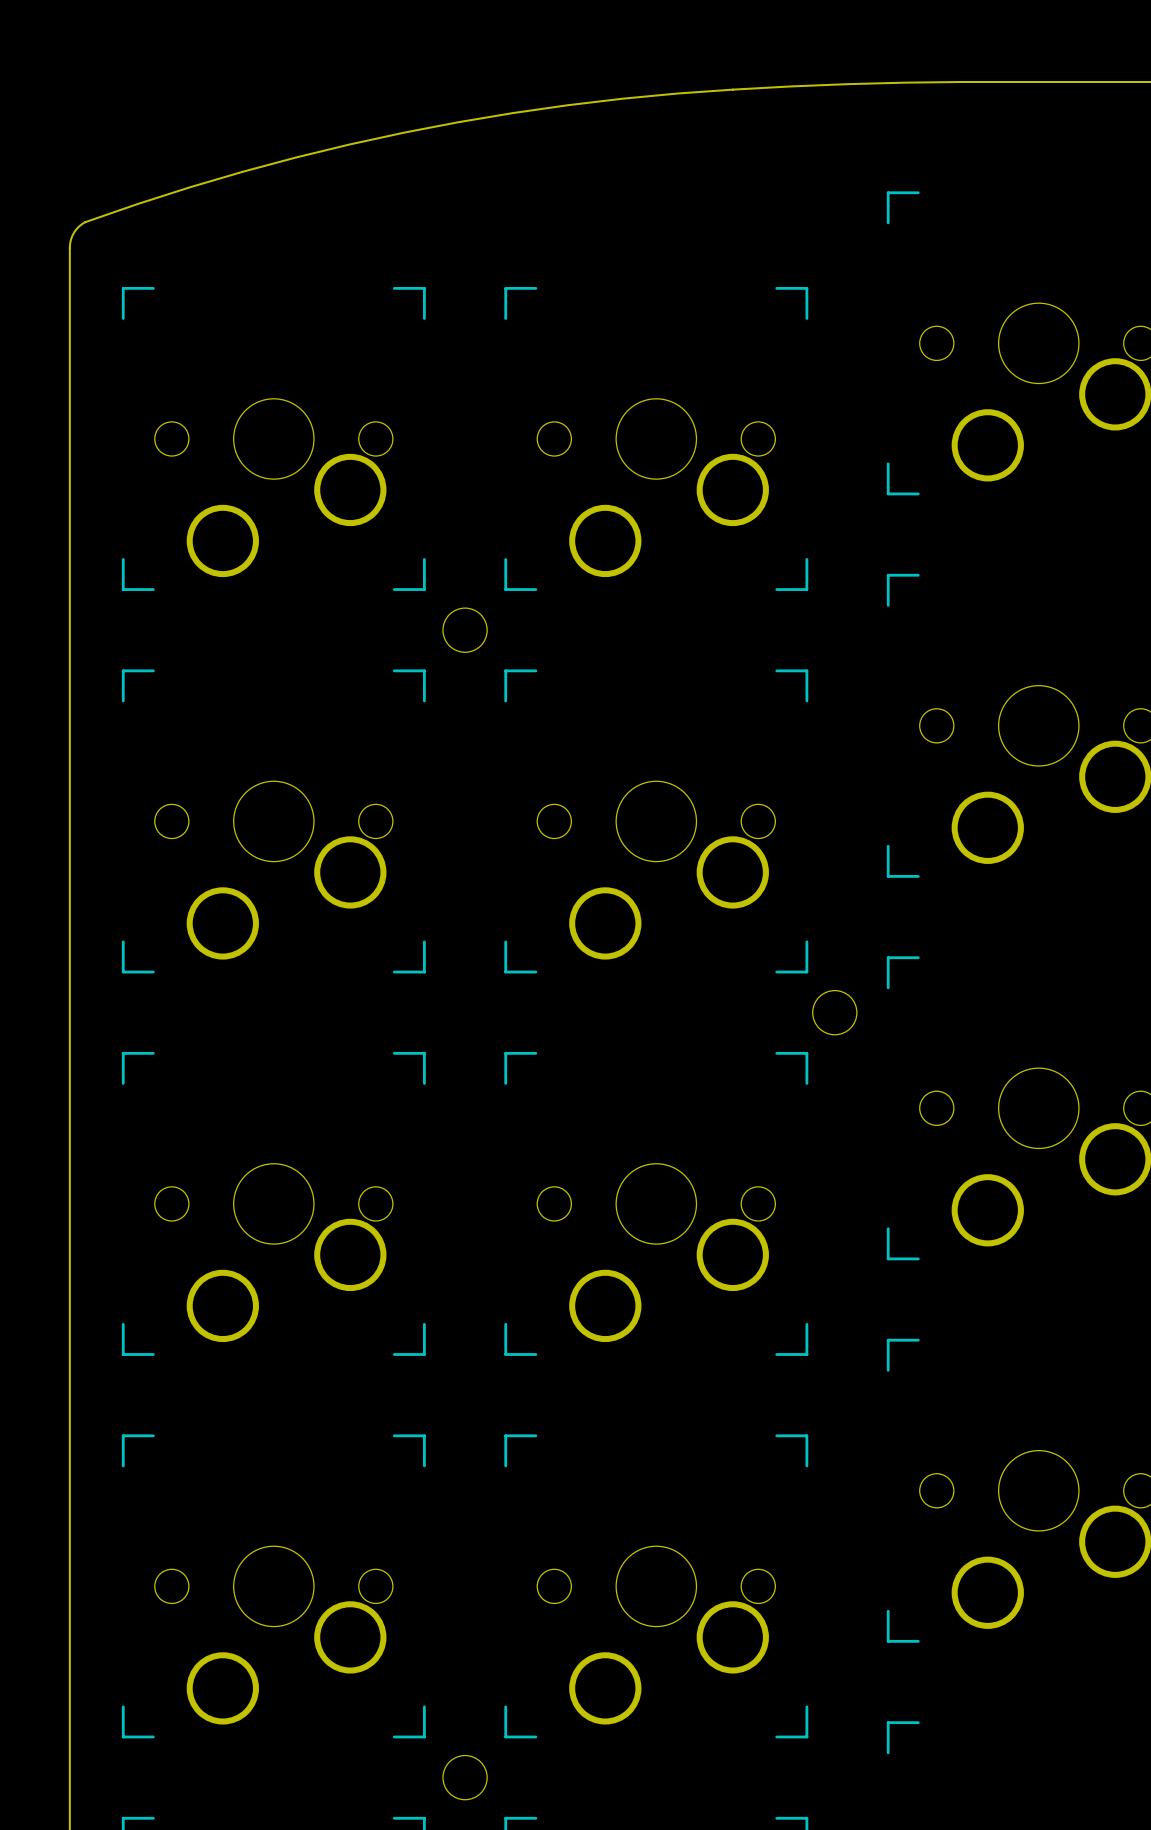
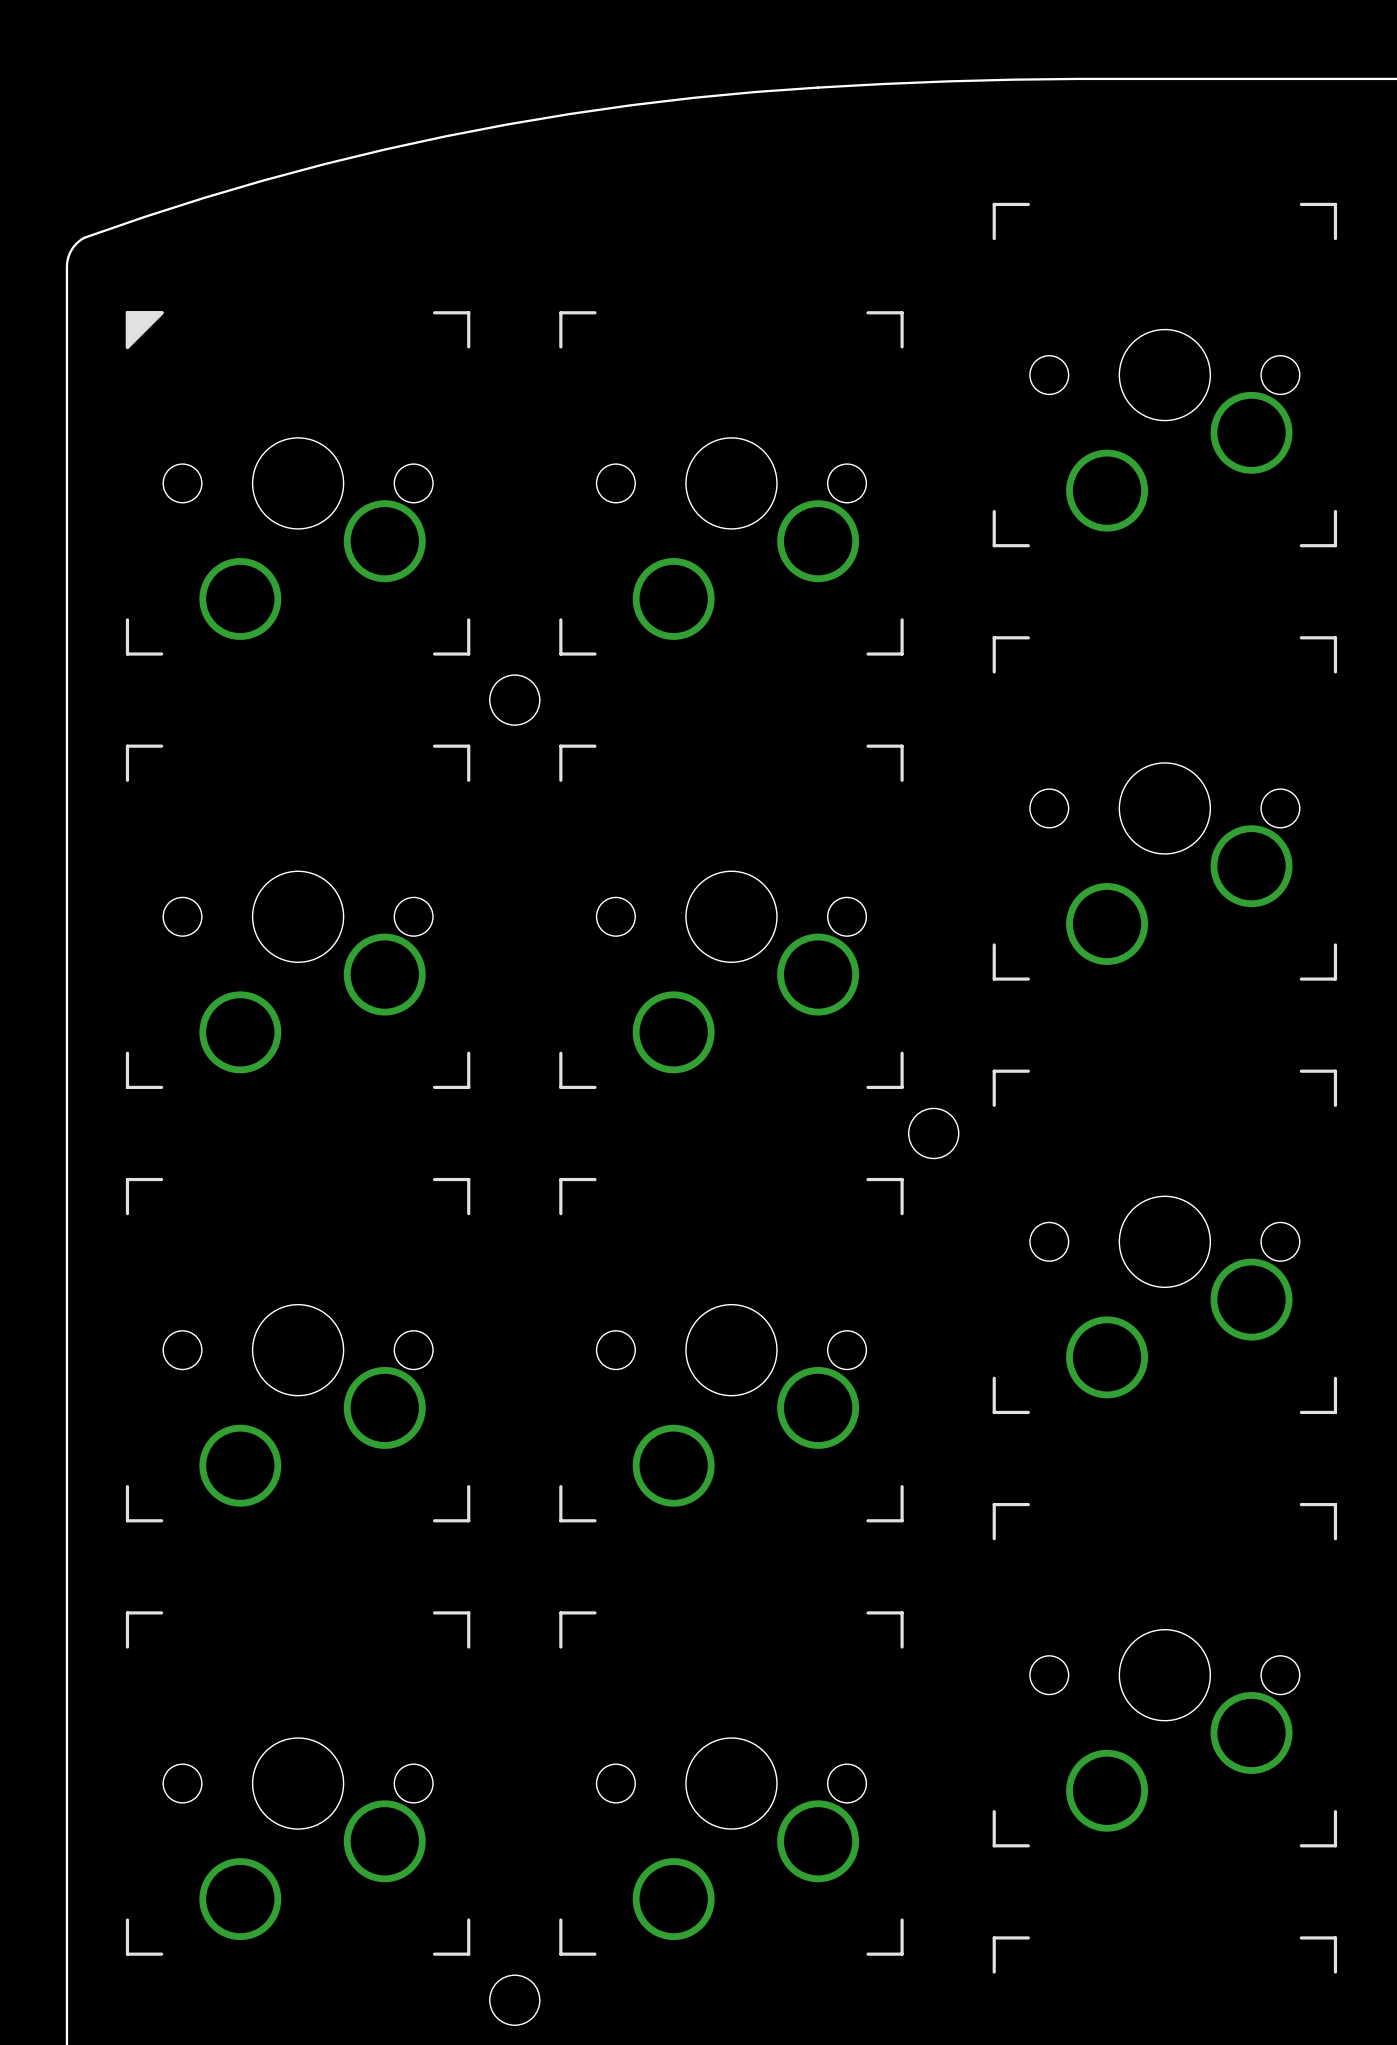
drawing: none -> [125, 311, 164, 350]

